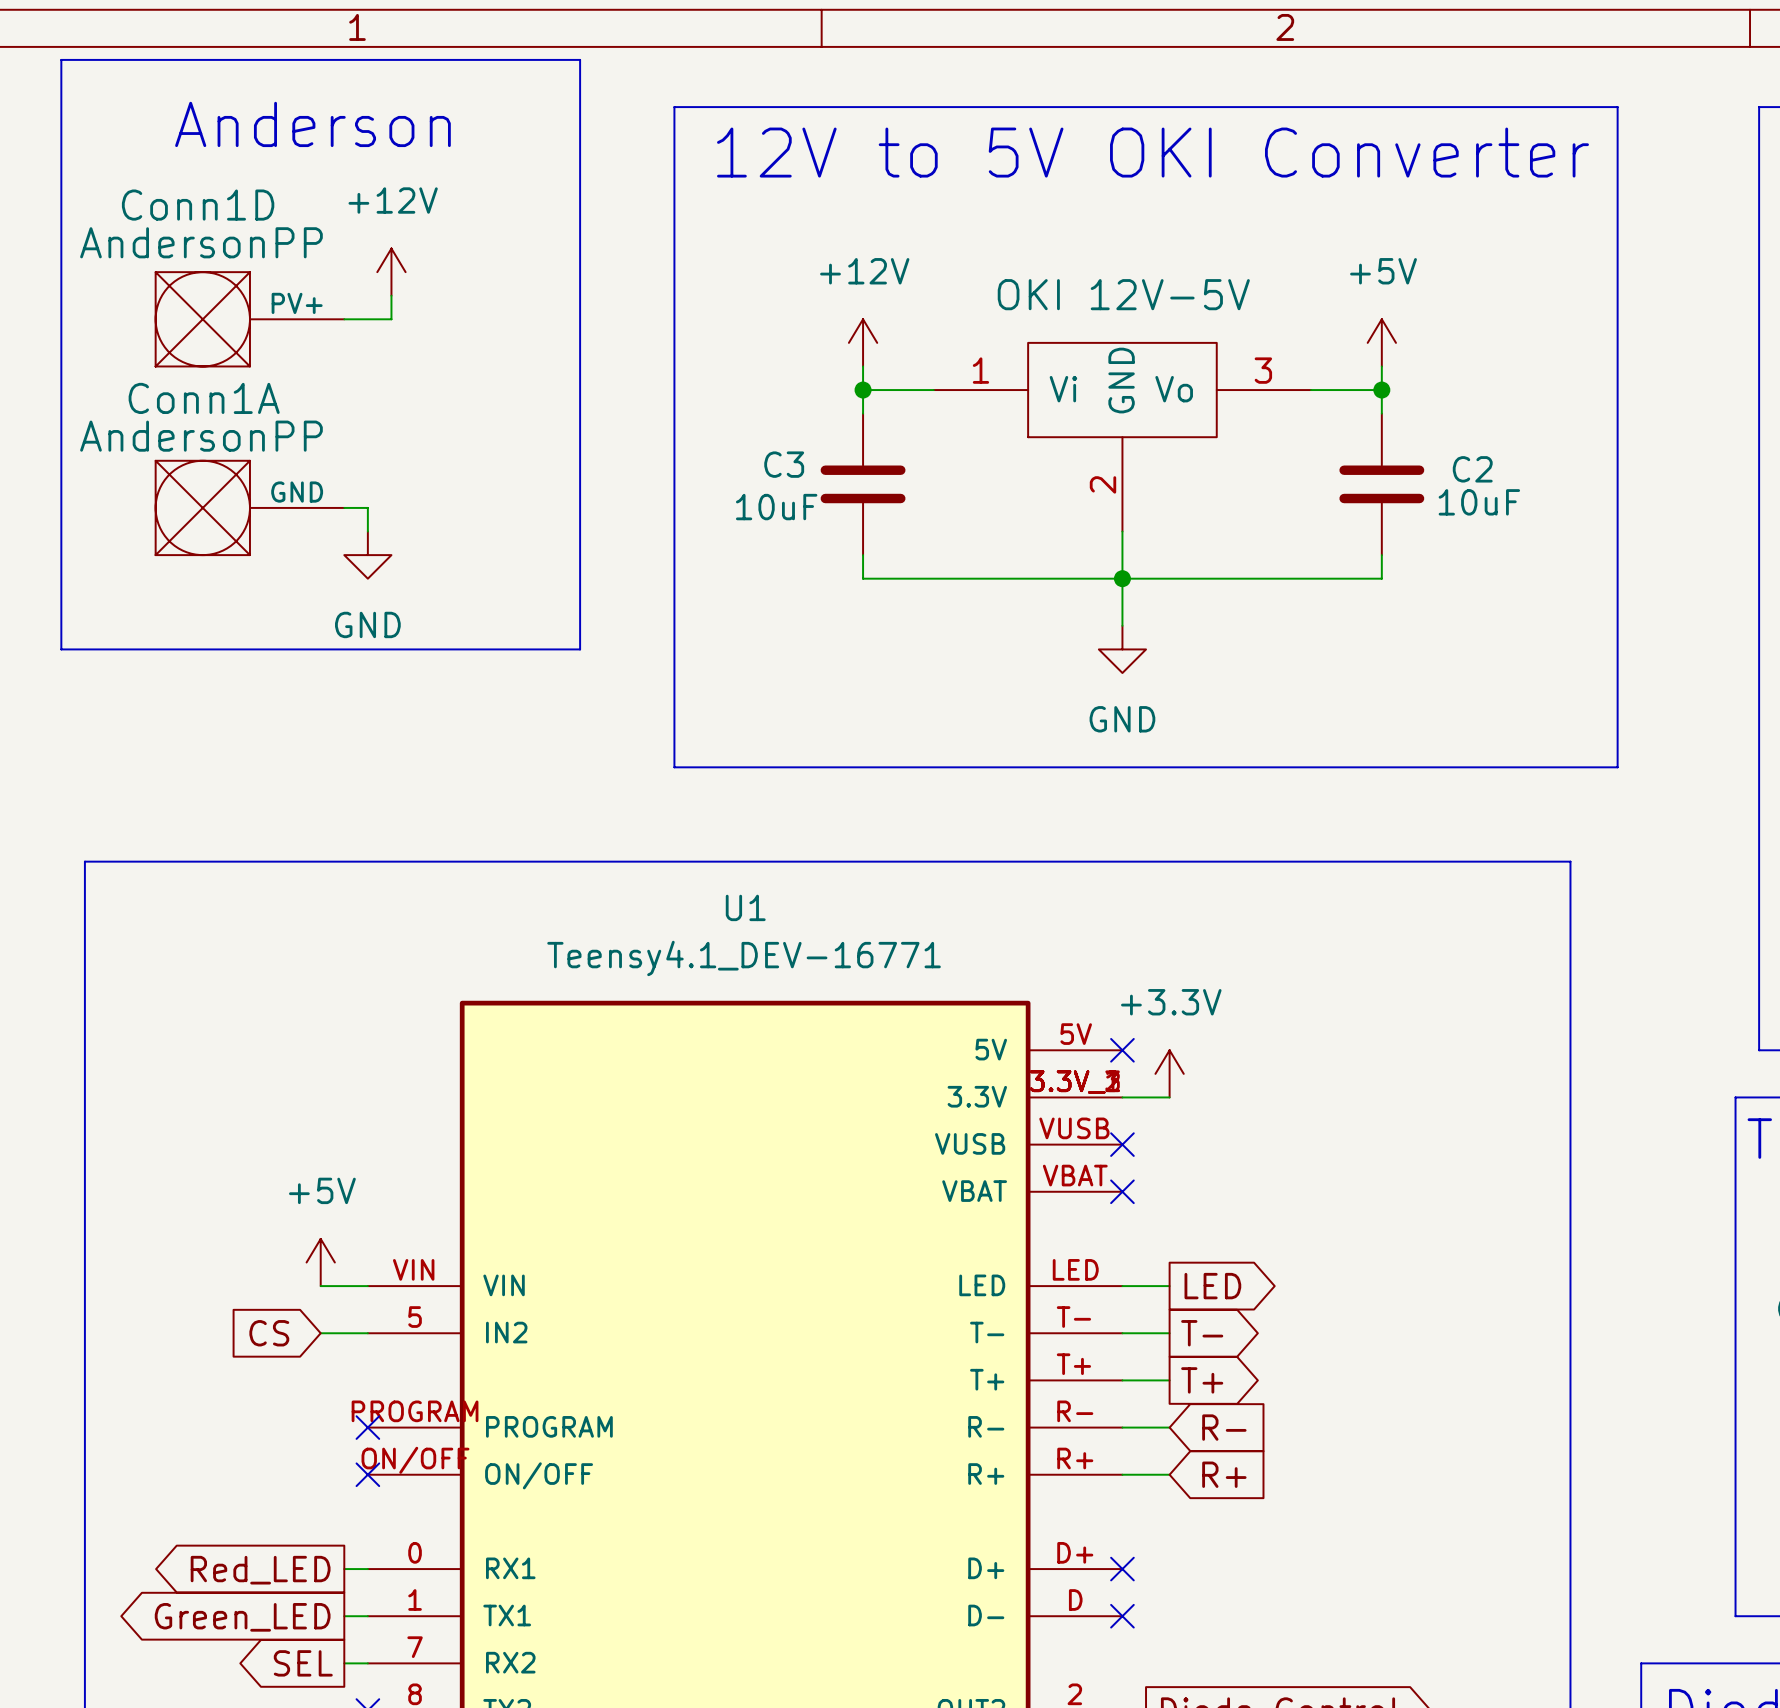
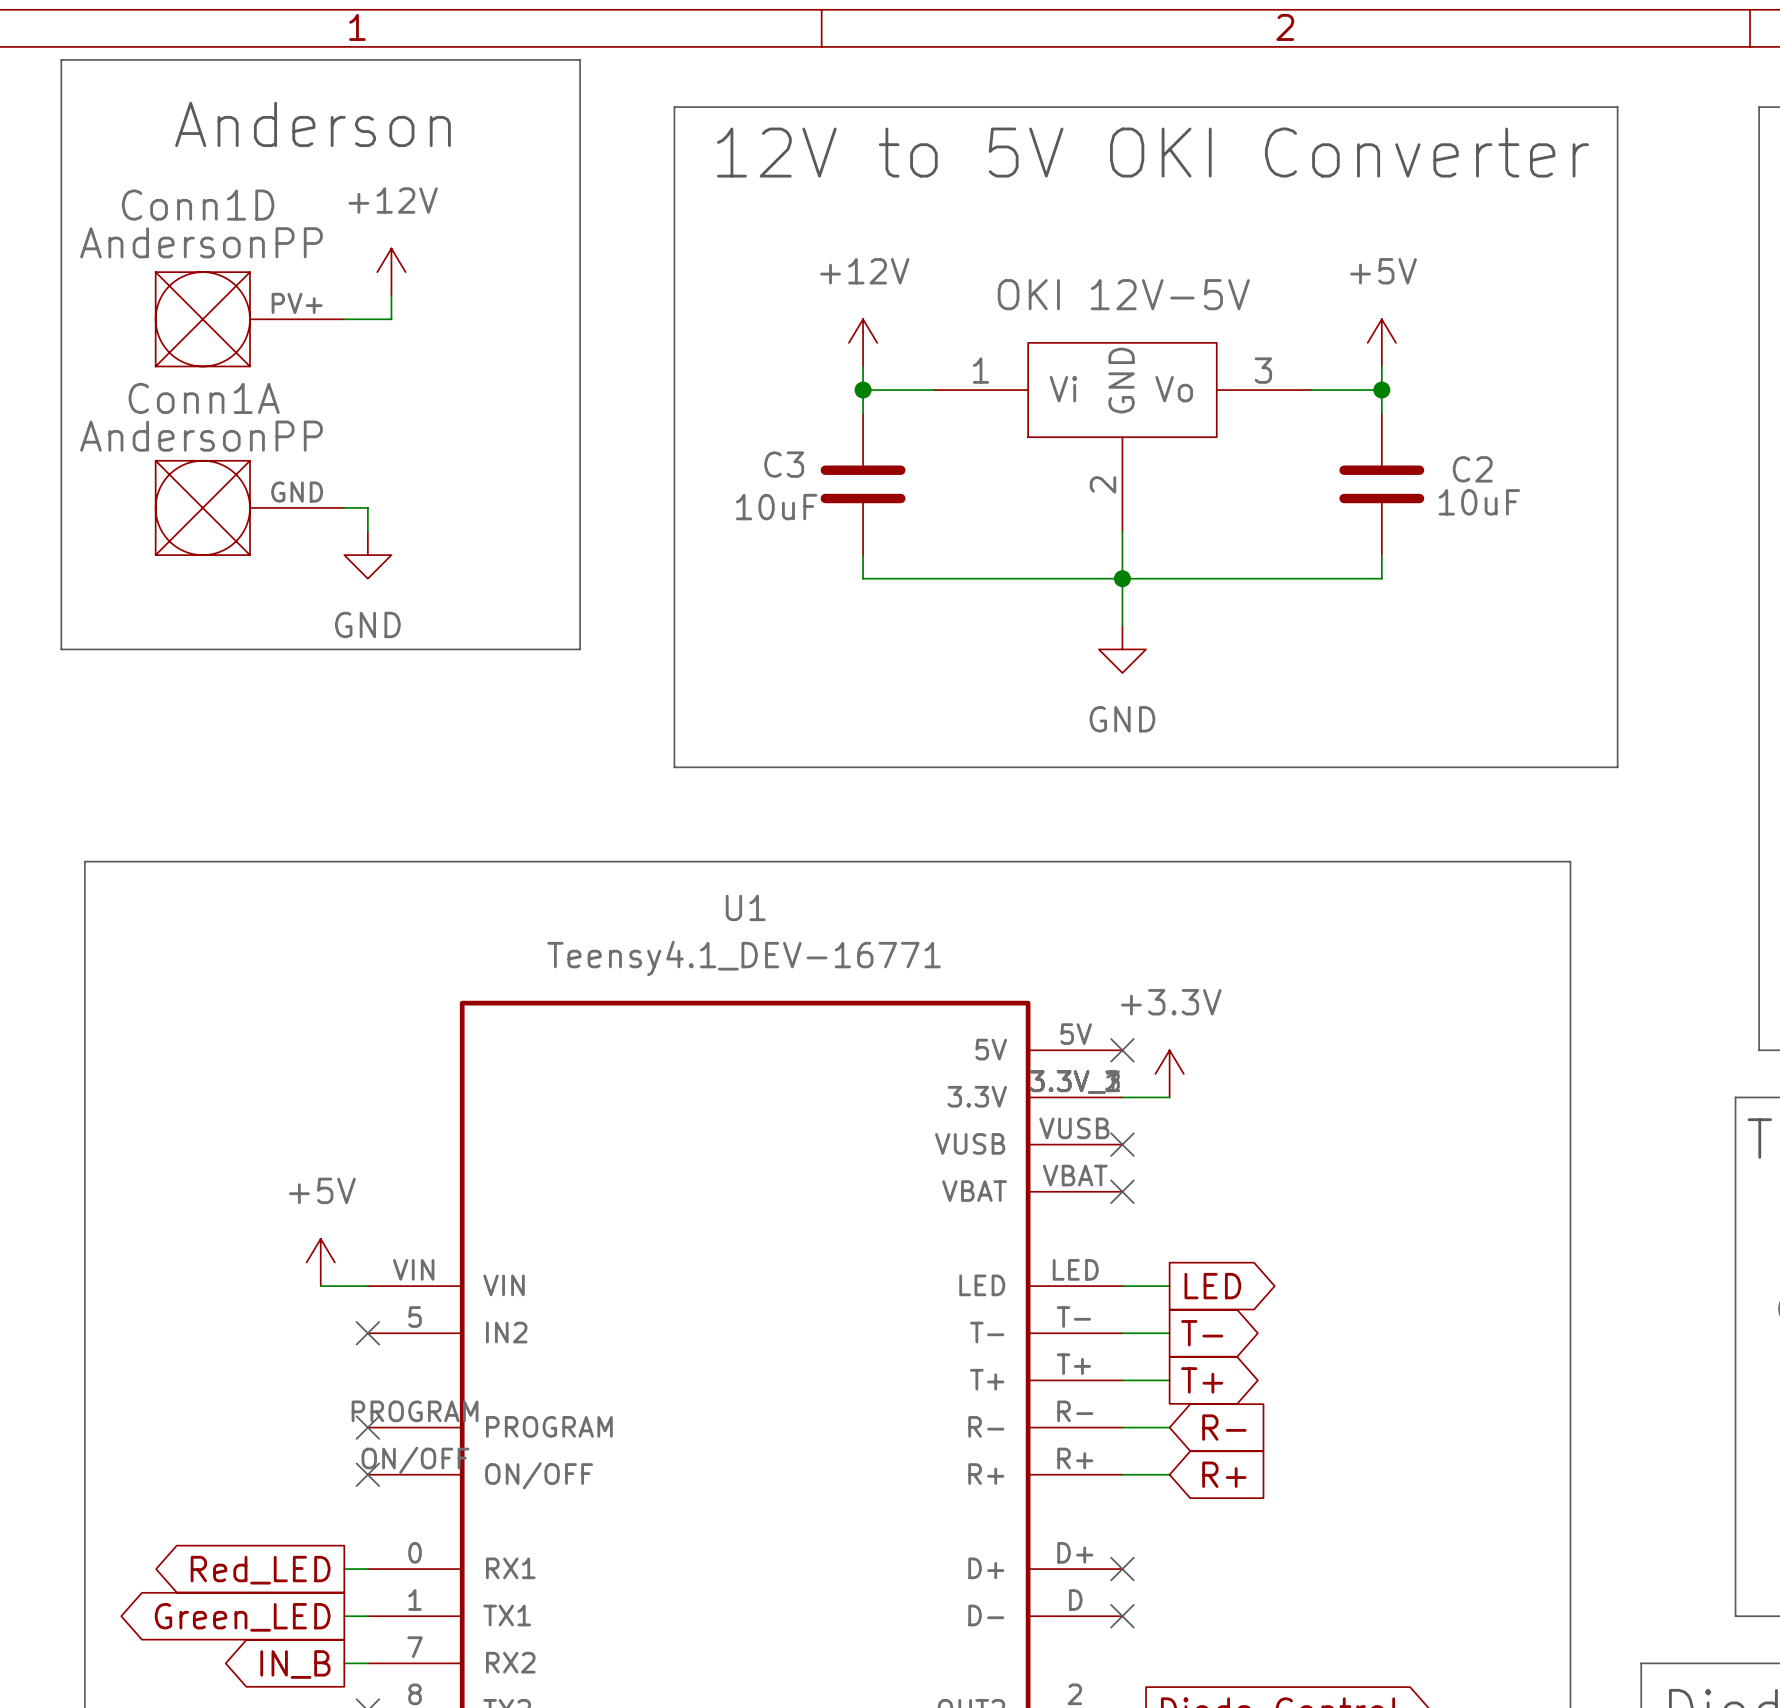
global label: CS (269, 1333) -> none
wire: (320, 1333) (367, 1333) -> none
no-connect mark: none -> (367, 1333)
global label: SEL (303, 1663) -> IN_B (295, 1664)

